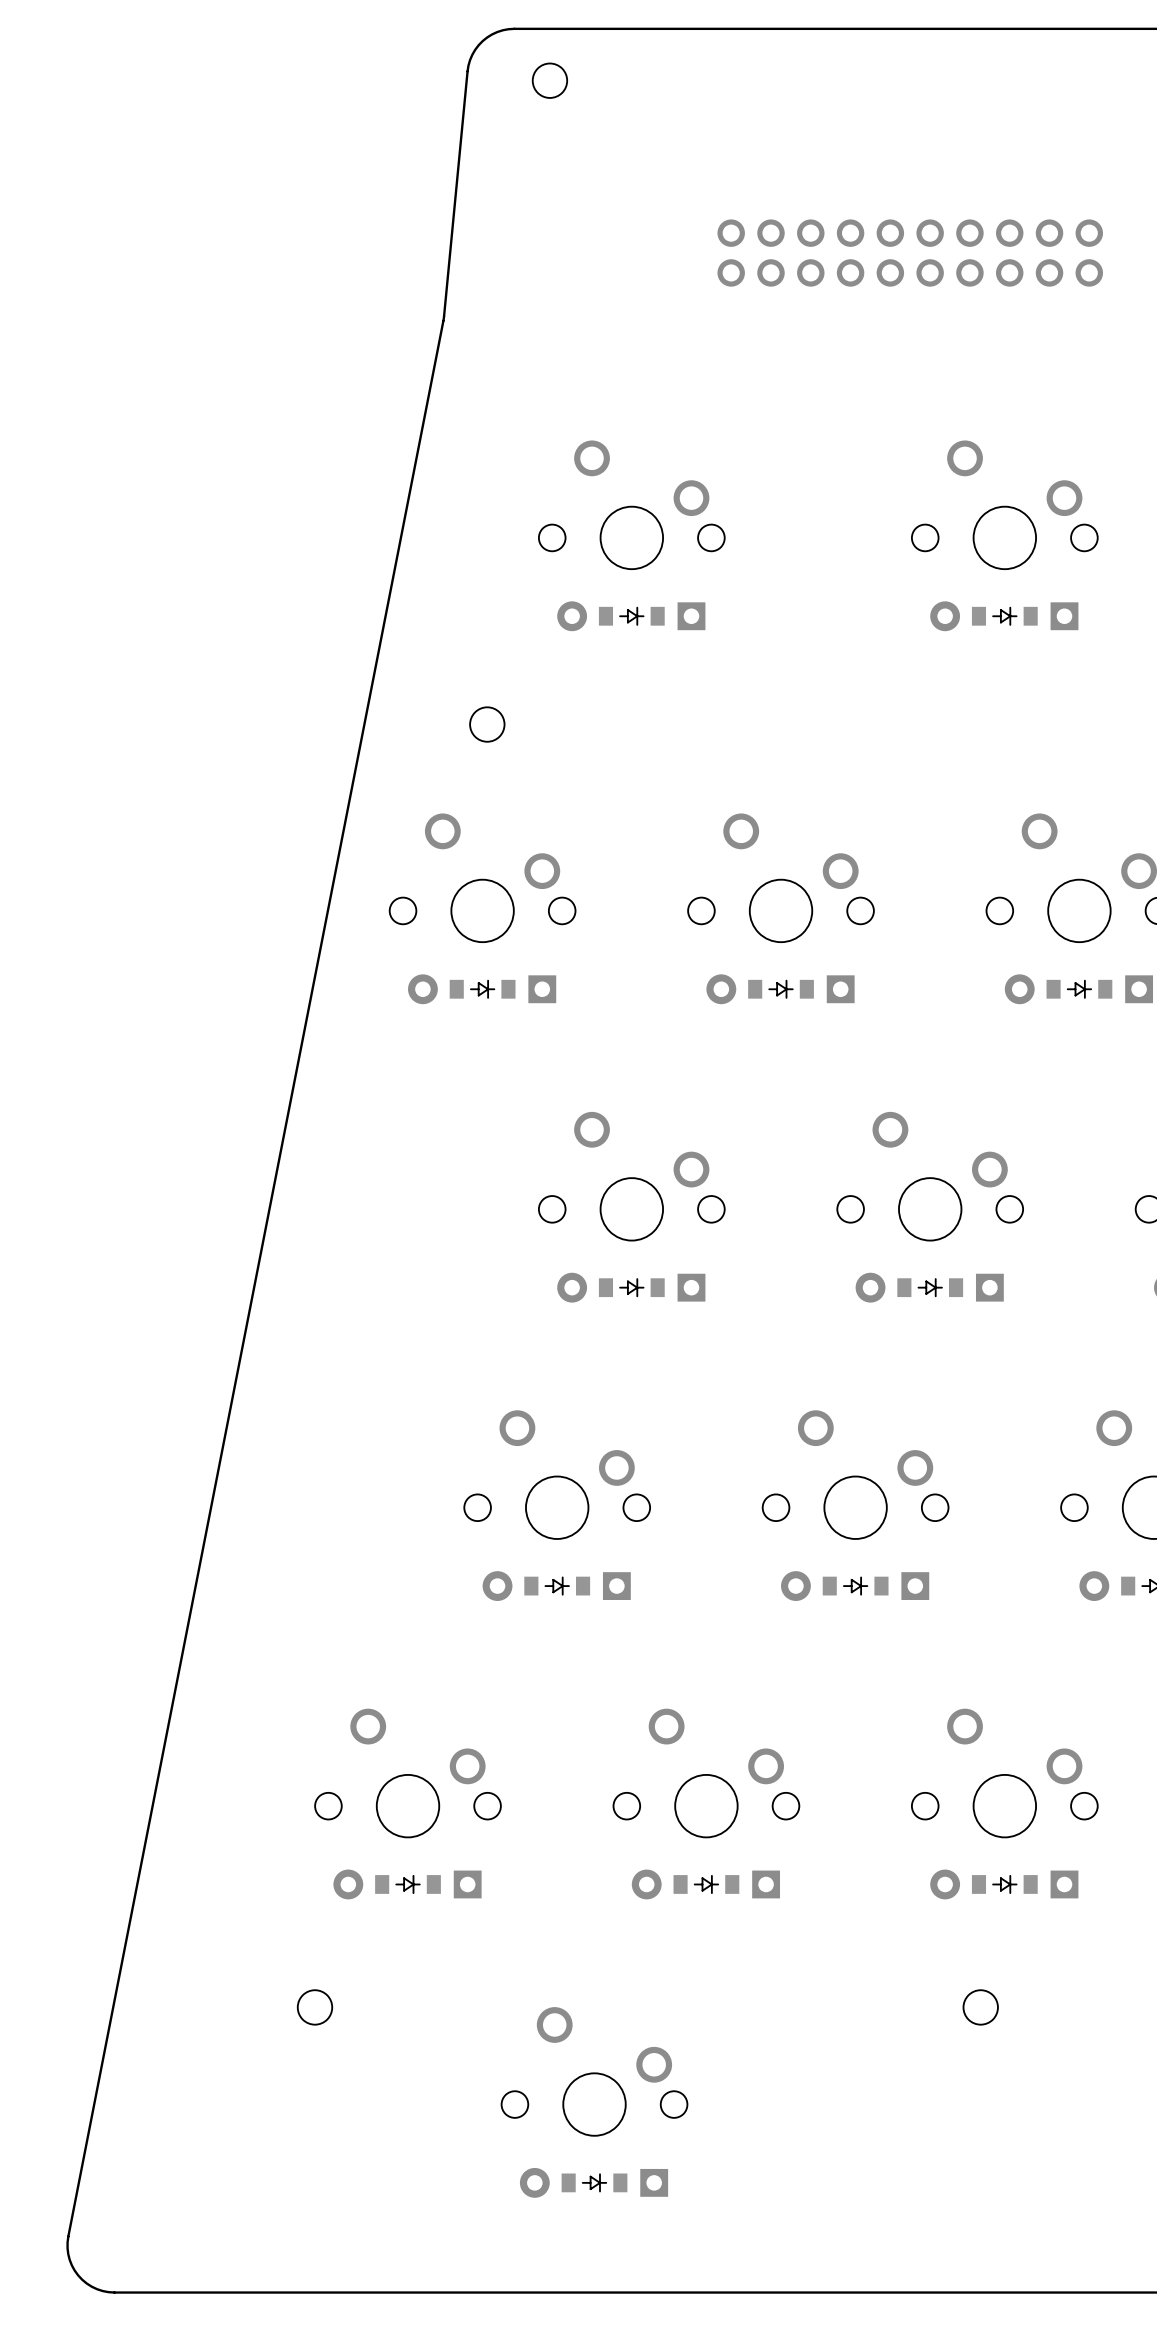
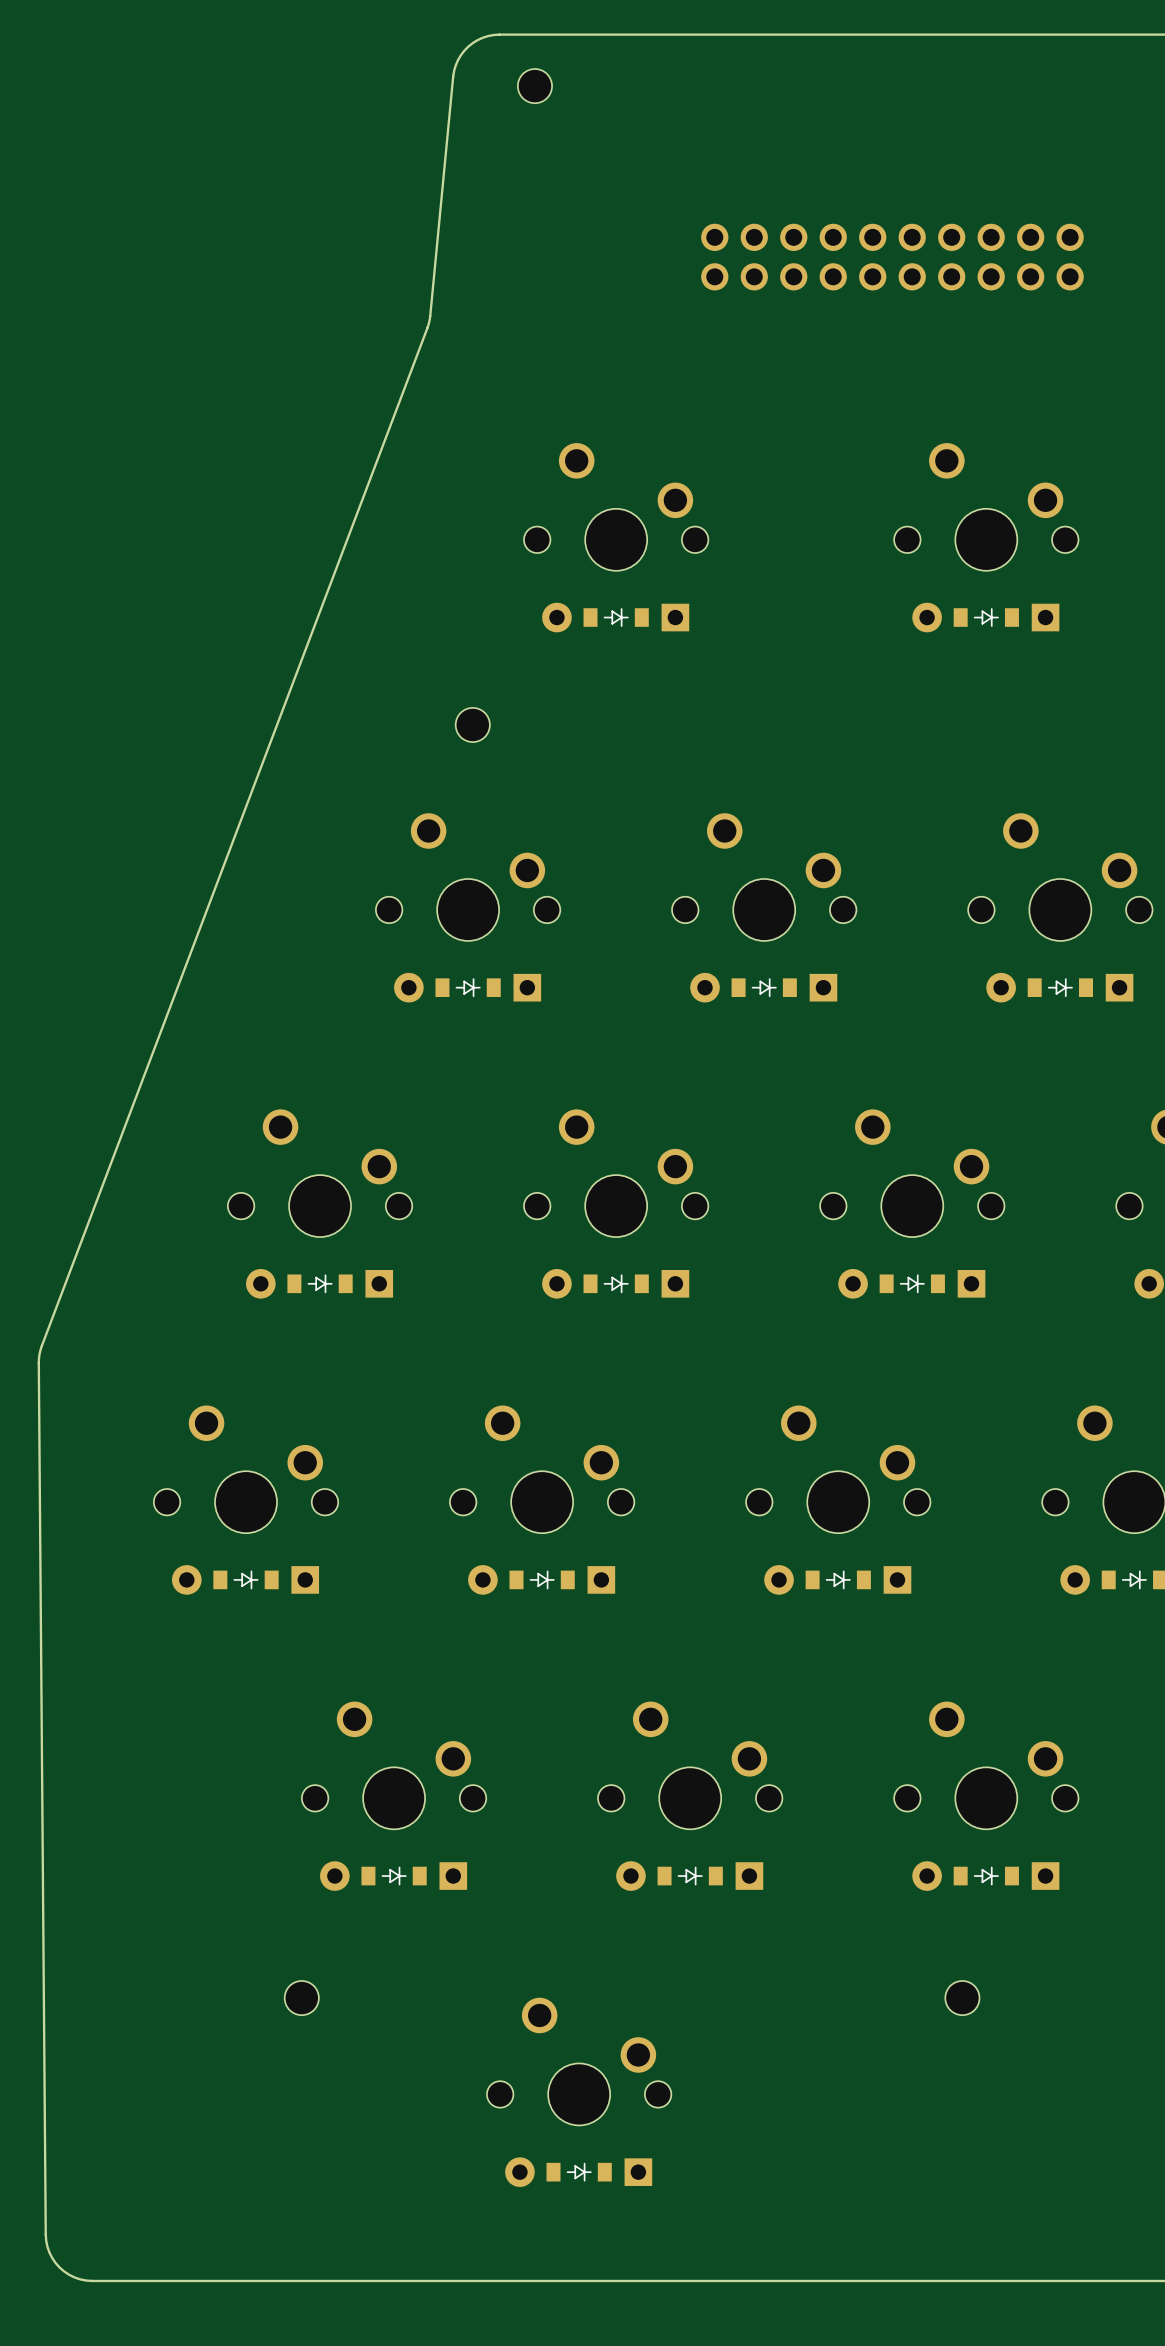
board edge: (444, 312) (68, 2236) (68, 2254) (78, 2275) (97, 2289) (114, 2292) -> (430, 315) (427, 328) (39, 1354) (45, 2234) (49, 2252) (55, 2262) (64, 2271) (80, 2279) (102, 2280)
part: none -> (320, 1173)
part: none -> (319, 1283)
part: none -> (246, 1469)
part: none -> (245, 1579)

